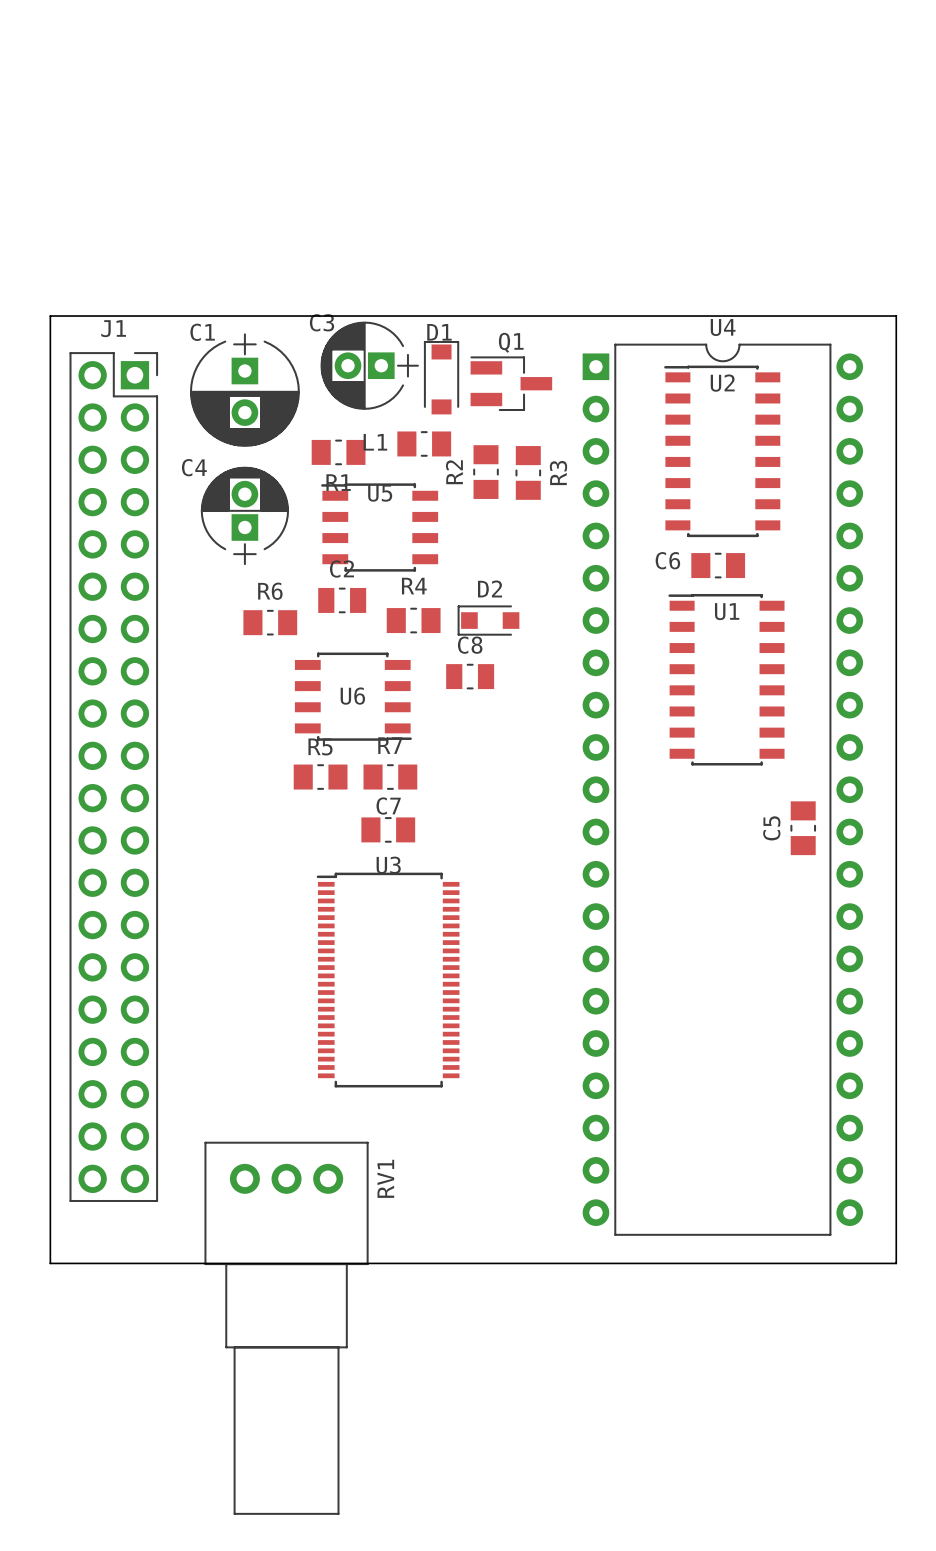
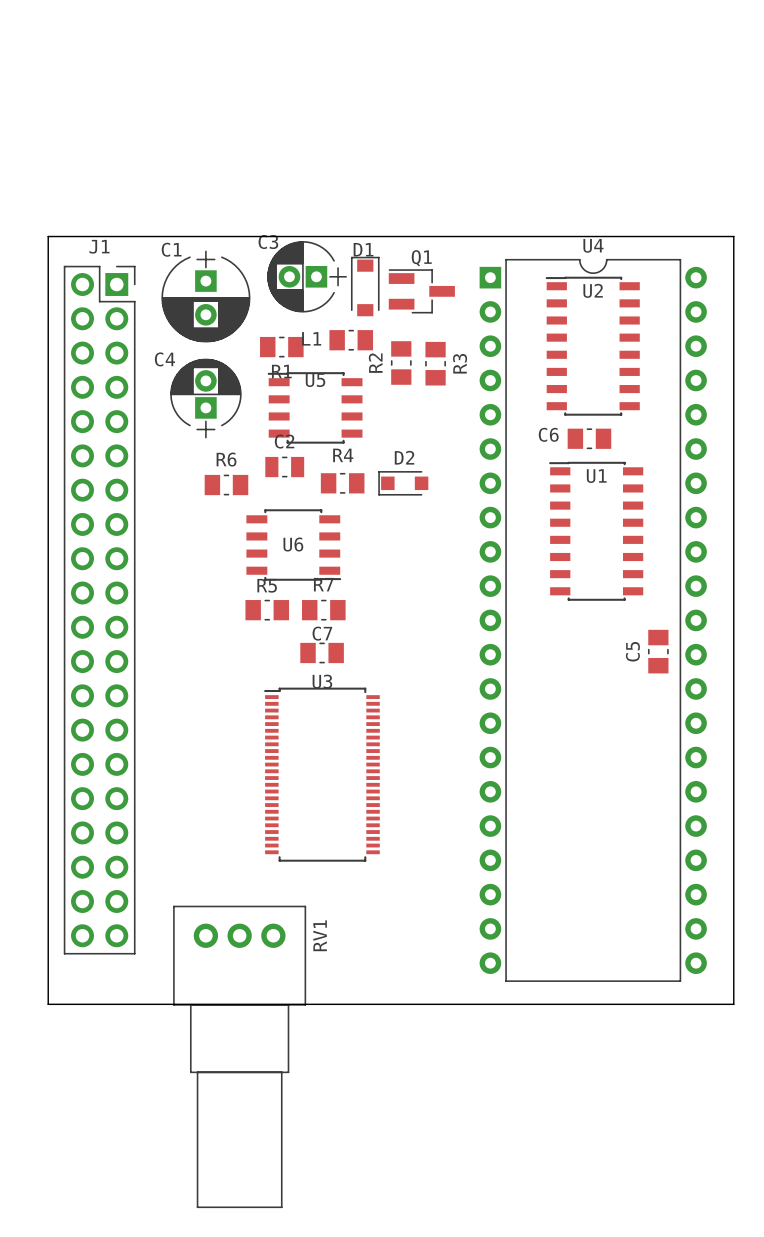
C8: (470, 676) -> none

